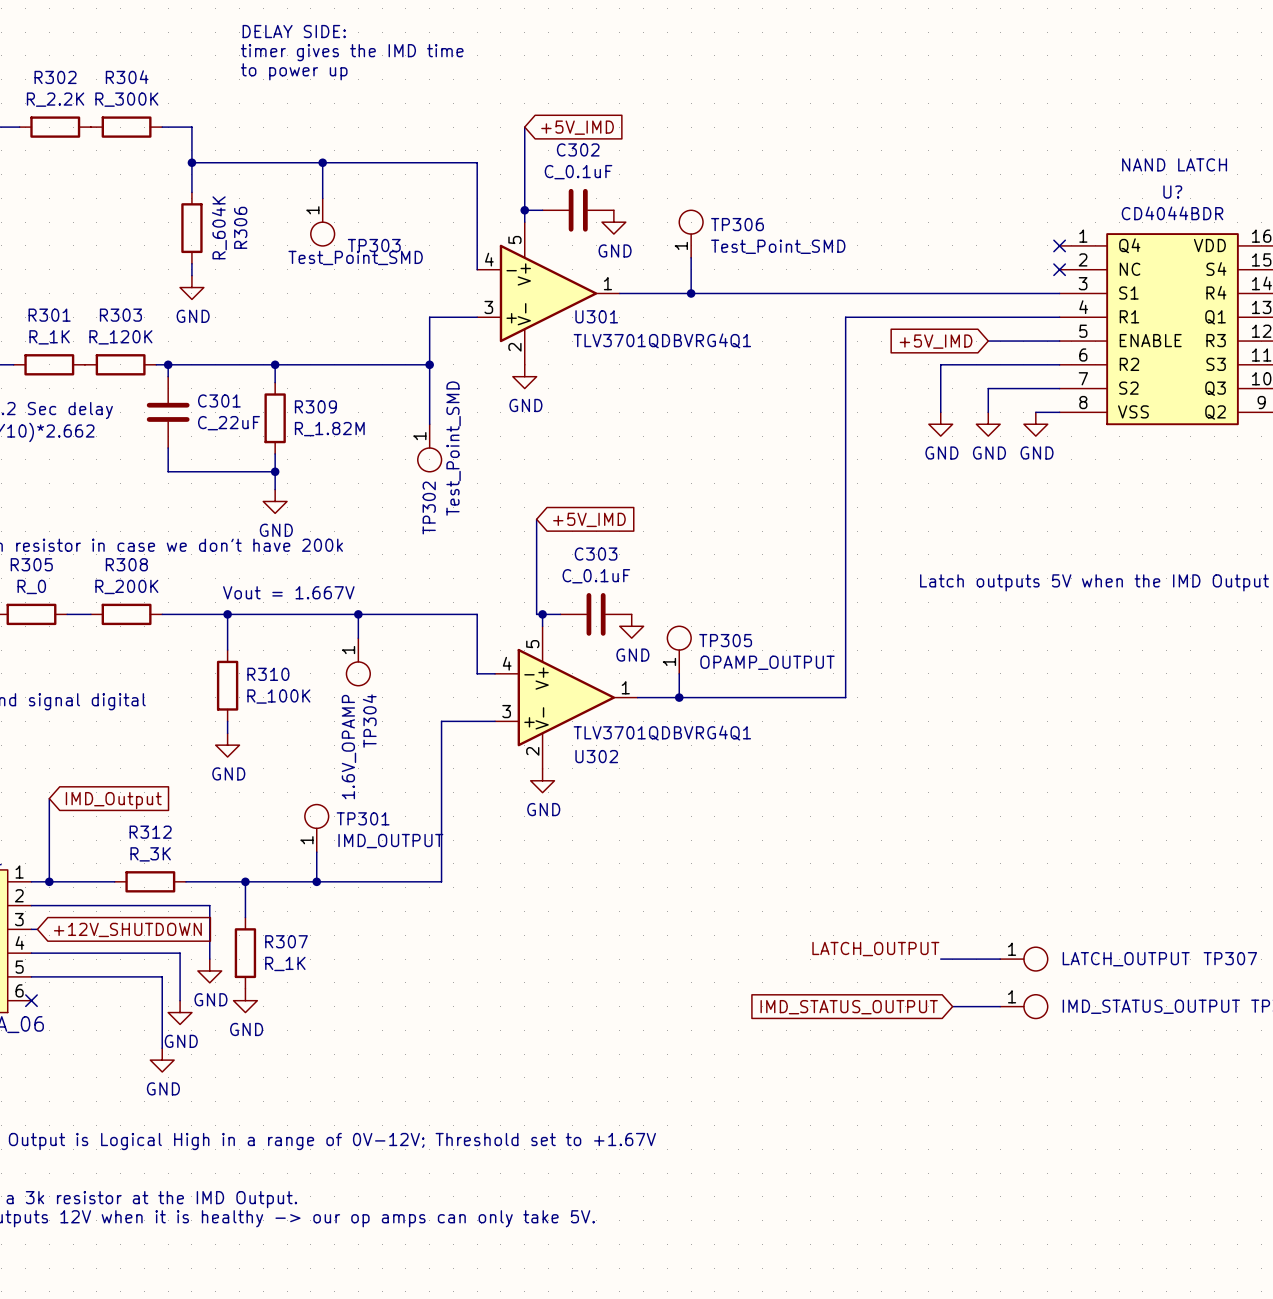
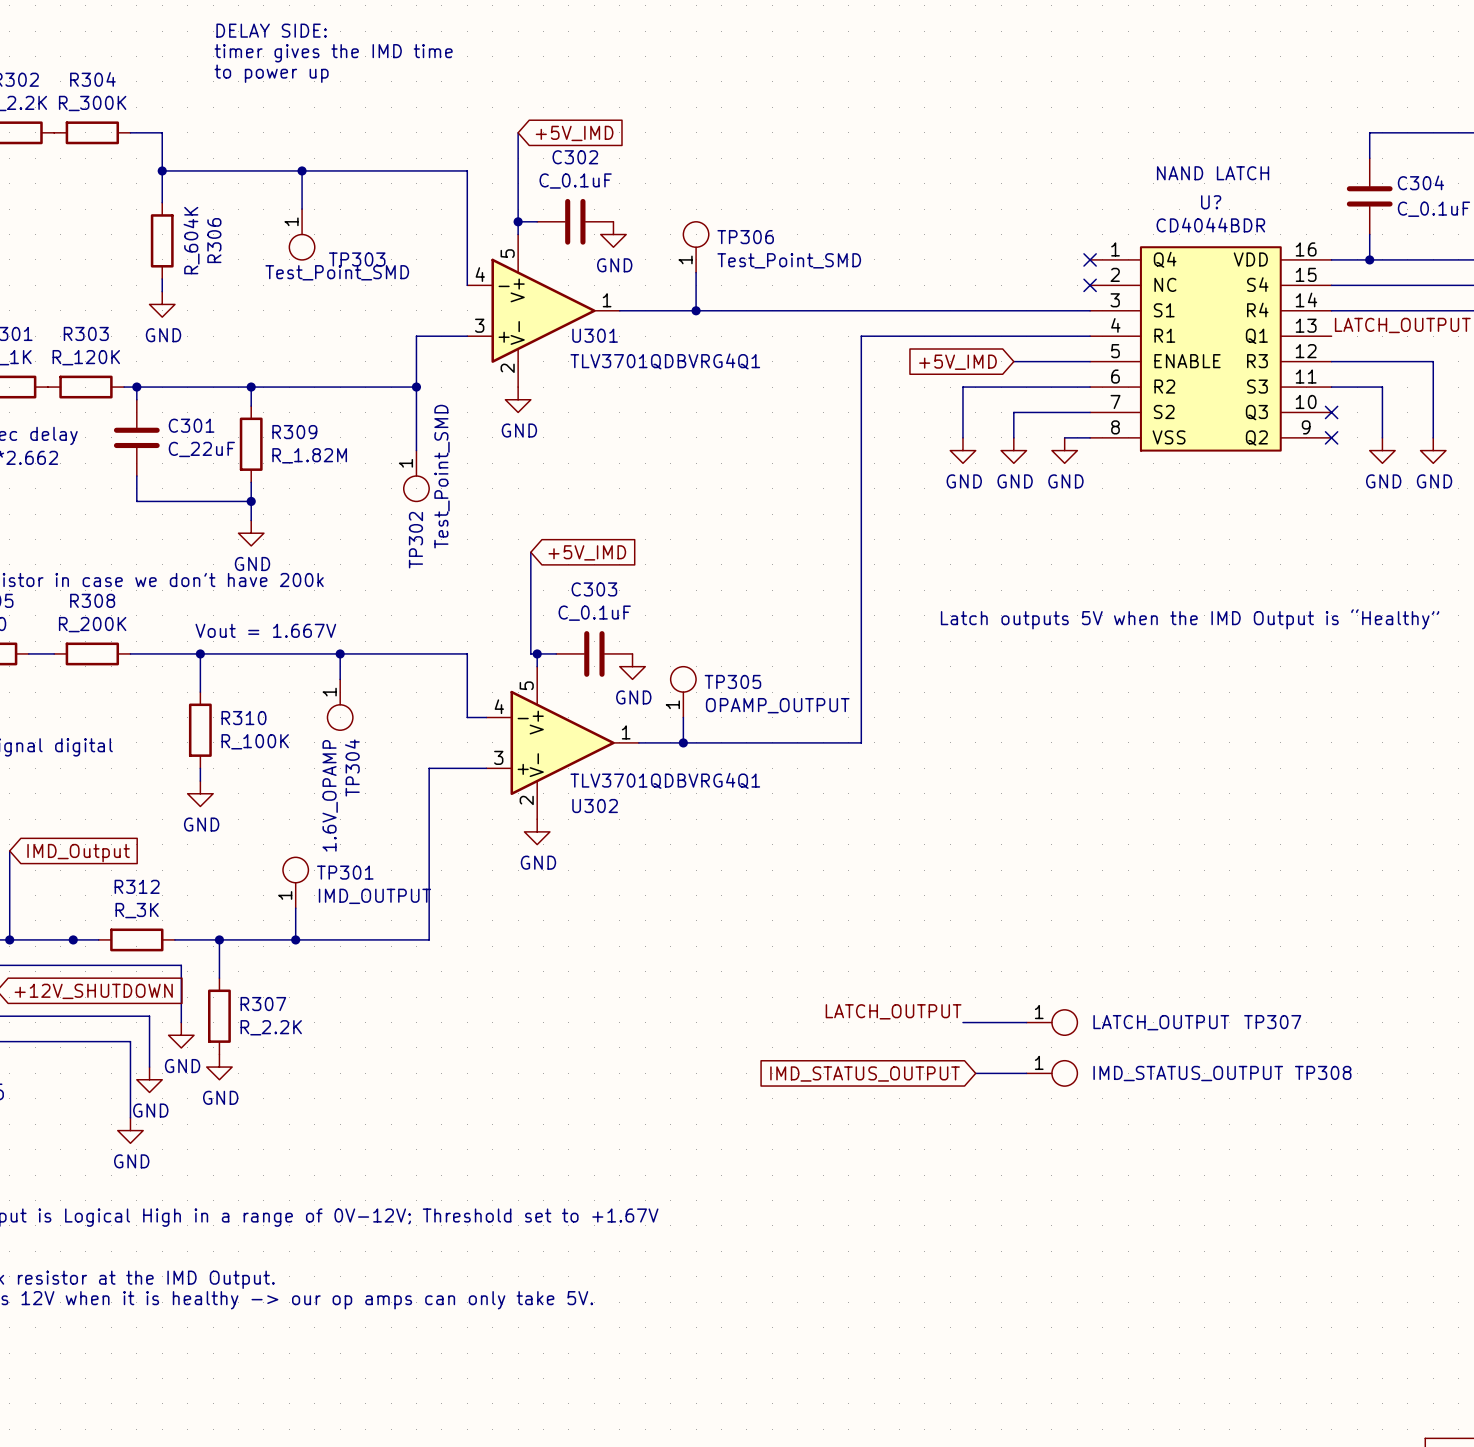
junction: none -> (73, 939)
R312 position: (150, 881) -> (136, 939)
R307 value: R_1K (285, 963) -> R_2.2K (271, 1027)

